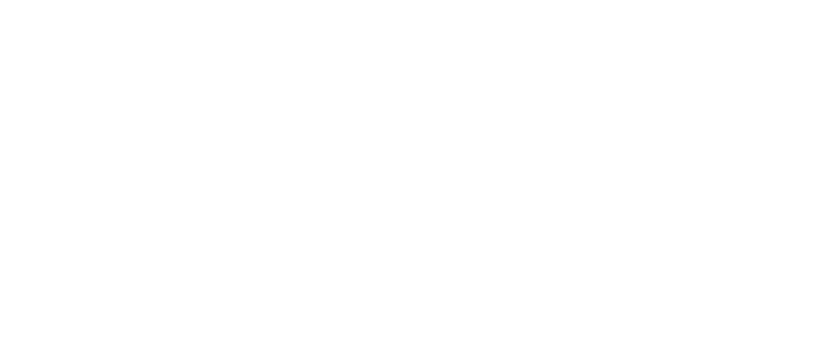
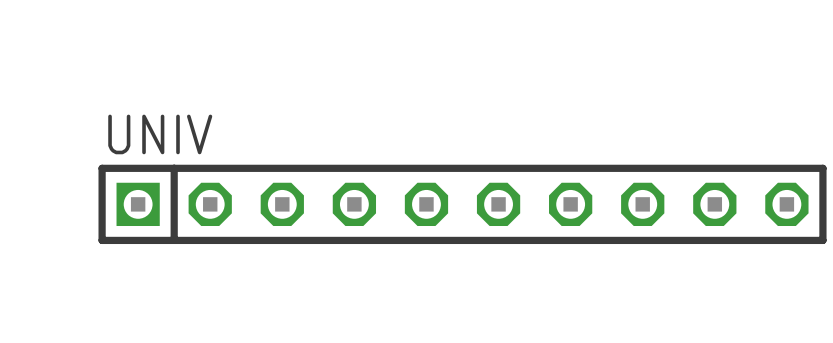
UNIV: none -> (462, 204)

